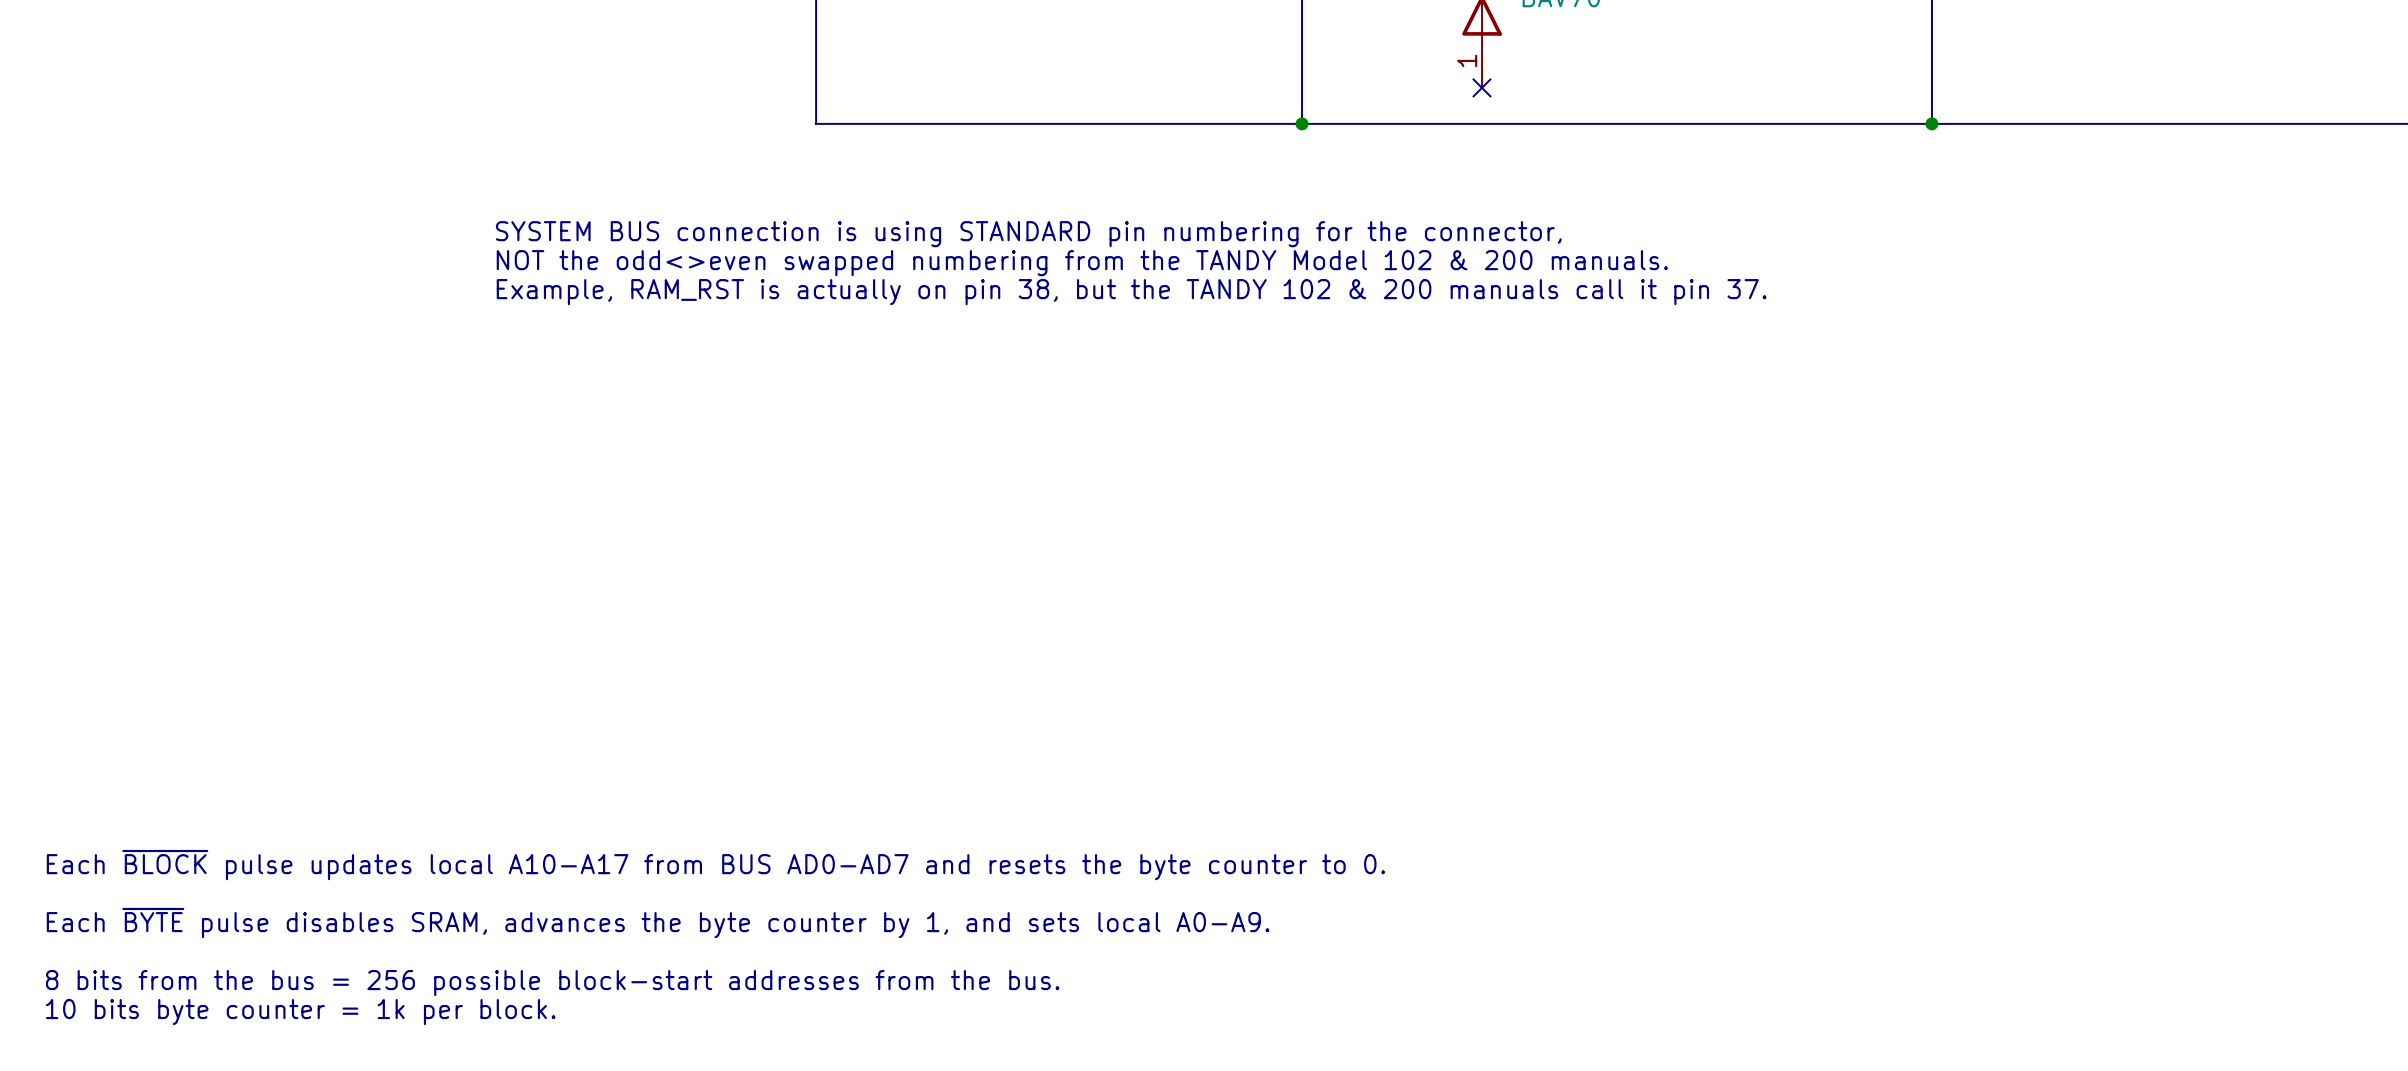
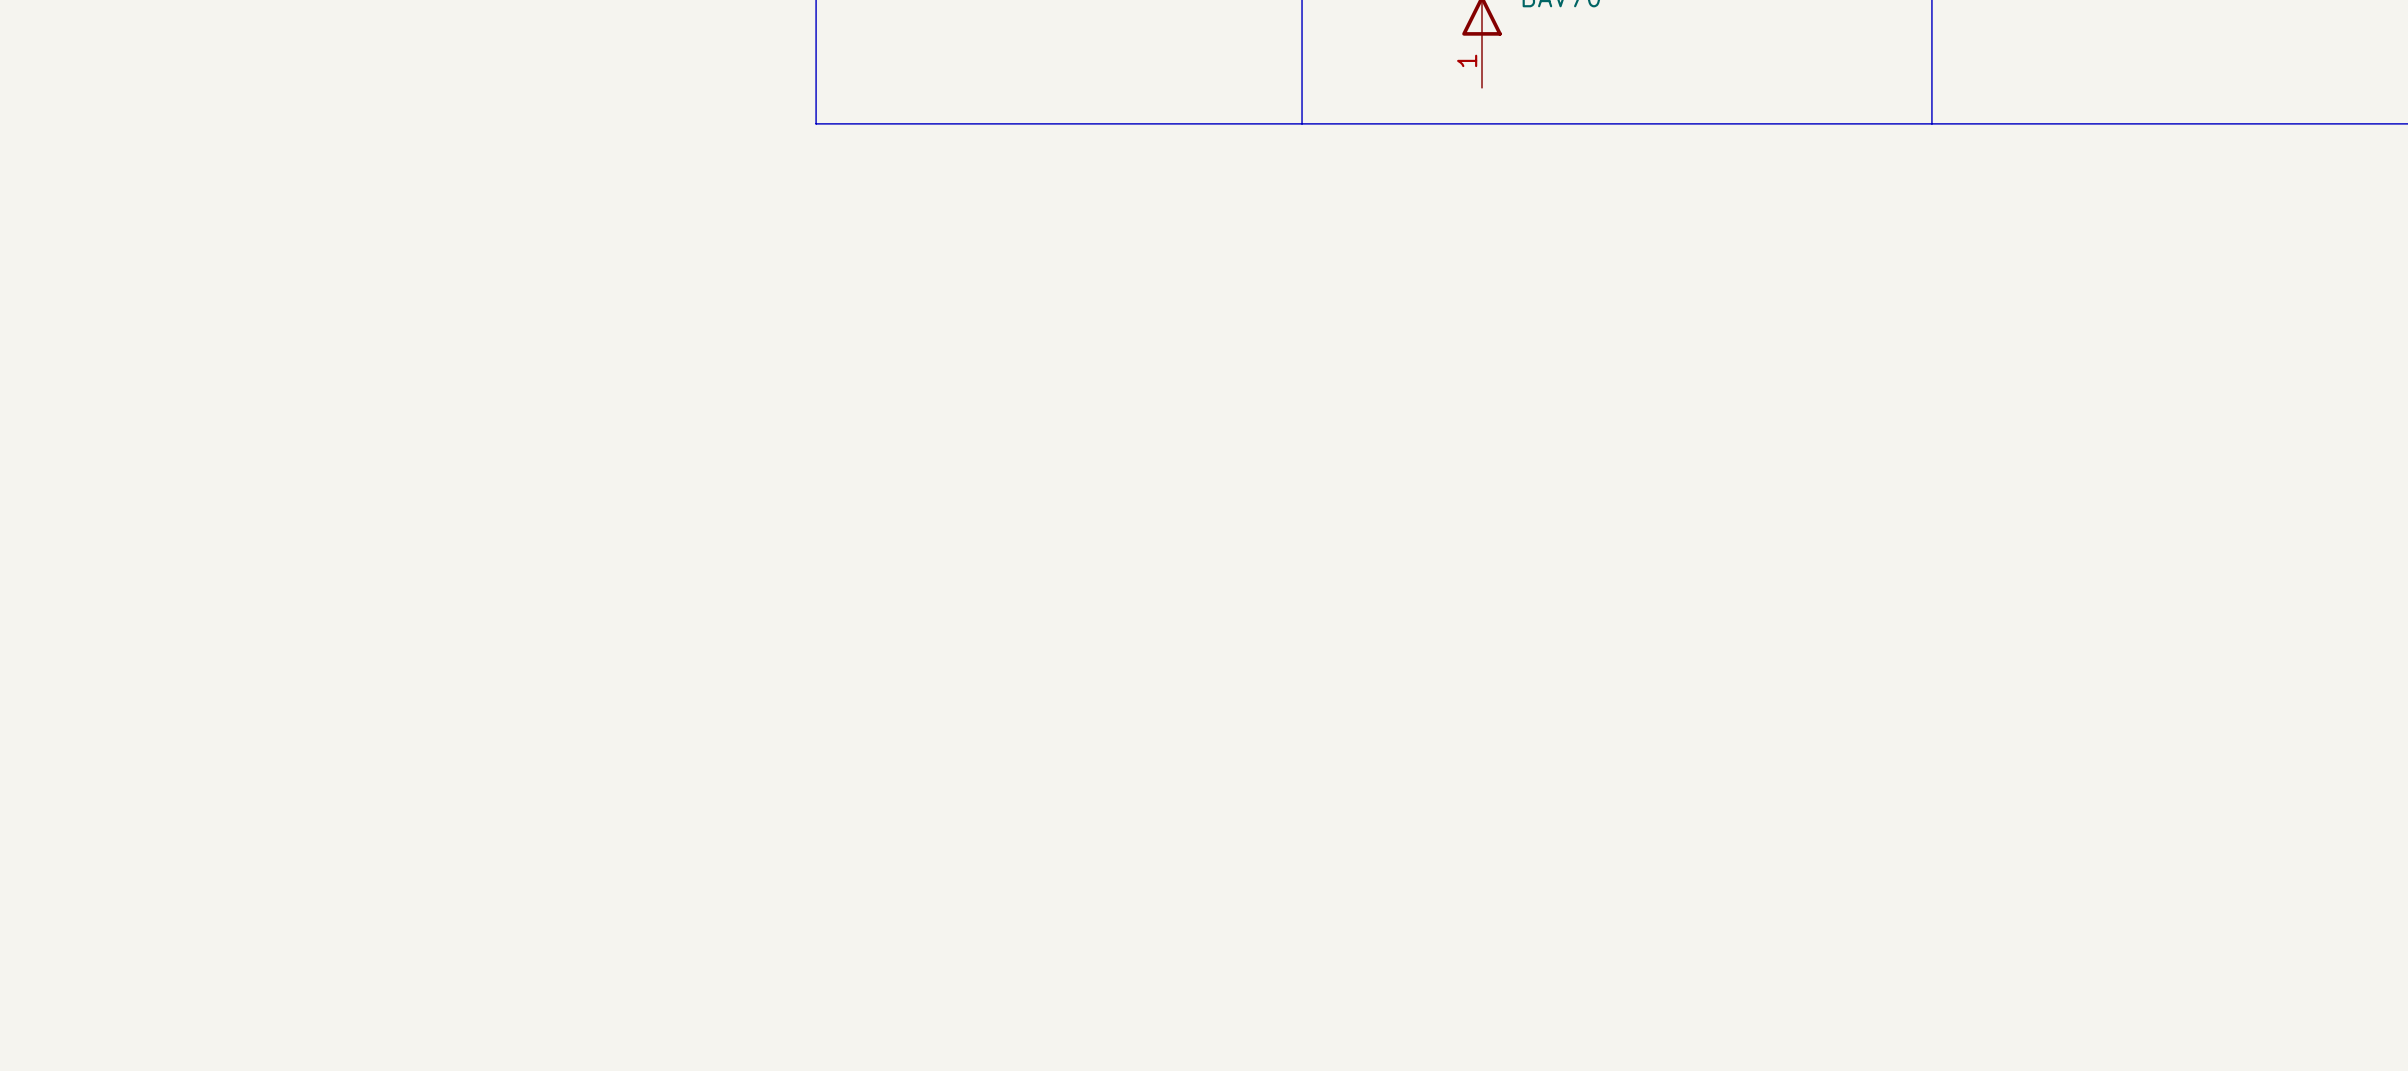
no-connect mark: (1482, 87) -> none
junction: (1302, 123) -> none
junction: (1931, 123) -> none
text: SYSTEM BUS connection is using STANDARD pin numbering for the connector, (1028, 234) -> none
text: NOT the odd<>even swapped numbering from the TANDY Model 102 & 200 manuals. (1082, 263) -> none
text: Example, RAM_RST is actually on pin 38, but the TANDY 102 & 200 manuals call it pin 37. (1131, 292) -> none
text: Each ~{BLOCK} pulse updates local A10-A17 from BUS AD0-AD7 and resets the byte counter to 0. (715, 865) -> none
text: Each ~{BYTE} pulse disables SRAM, advances the byte counter by 1, and sets local A0-A9. (658, 923) -> none
text: 8 bits from the bus = 256 possible block-start addresses from the bus. (552, 983) -> none
text: 10 bits byte counter = 1k per block. (300, 1012) -> none

